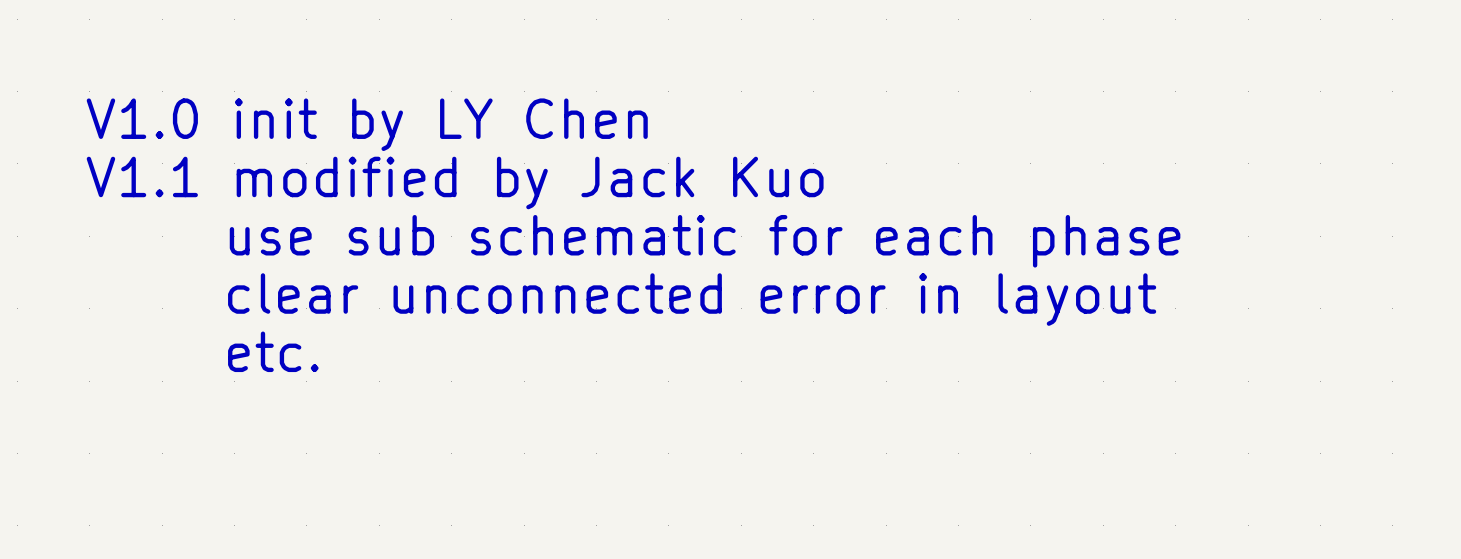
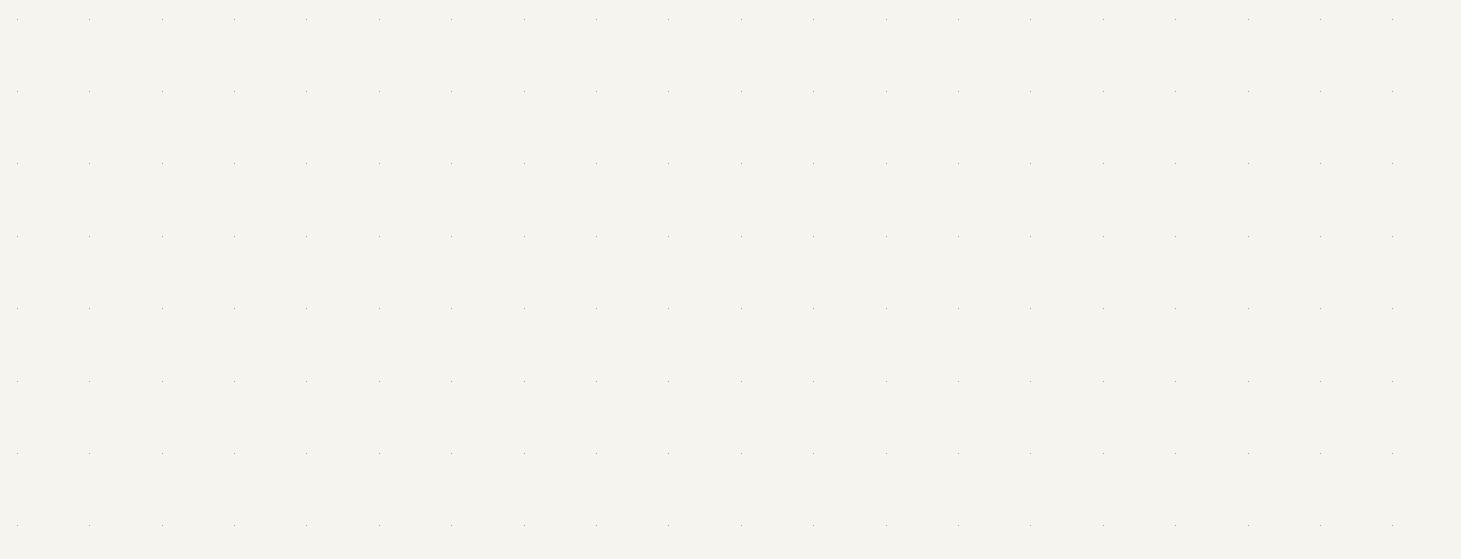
text: V1.0 init by LY Chen (367, 124) -> none
text: V1.1 modified by Jack Kuo (455, 183) -> none
text: use sub schematic for each phase (705, 241) -> none
text: clear unconnected error in layout (692, 299) -> none
text: etc. (273, 351) -> none

